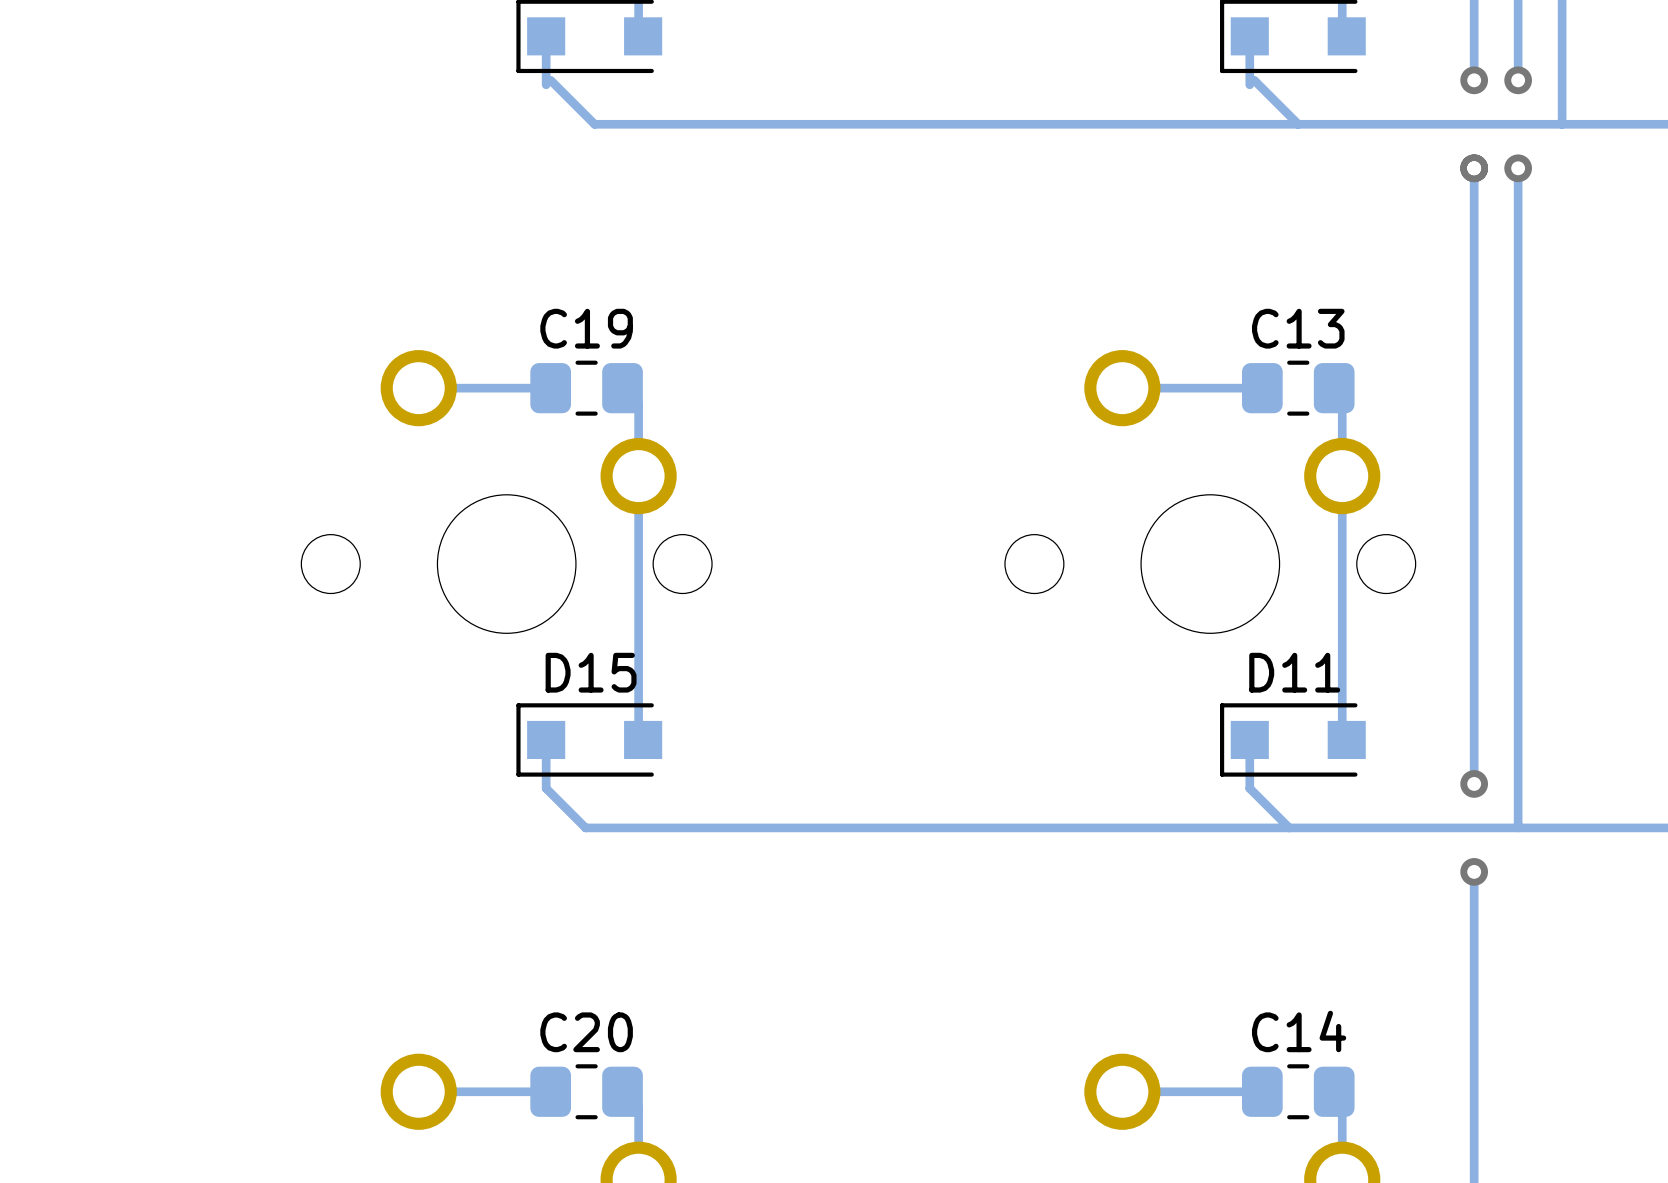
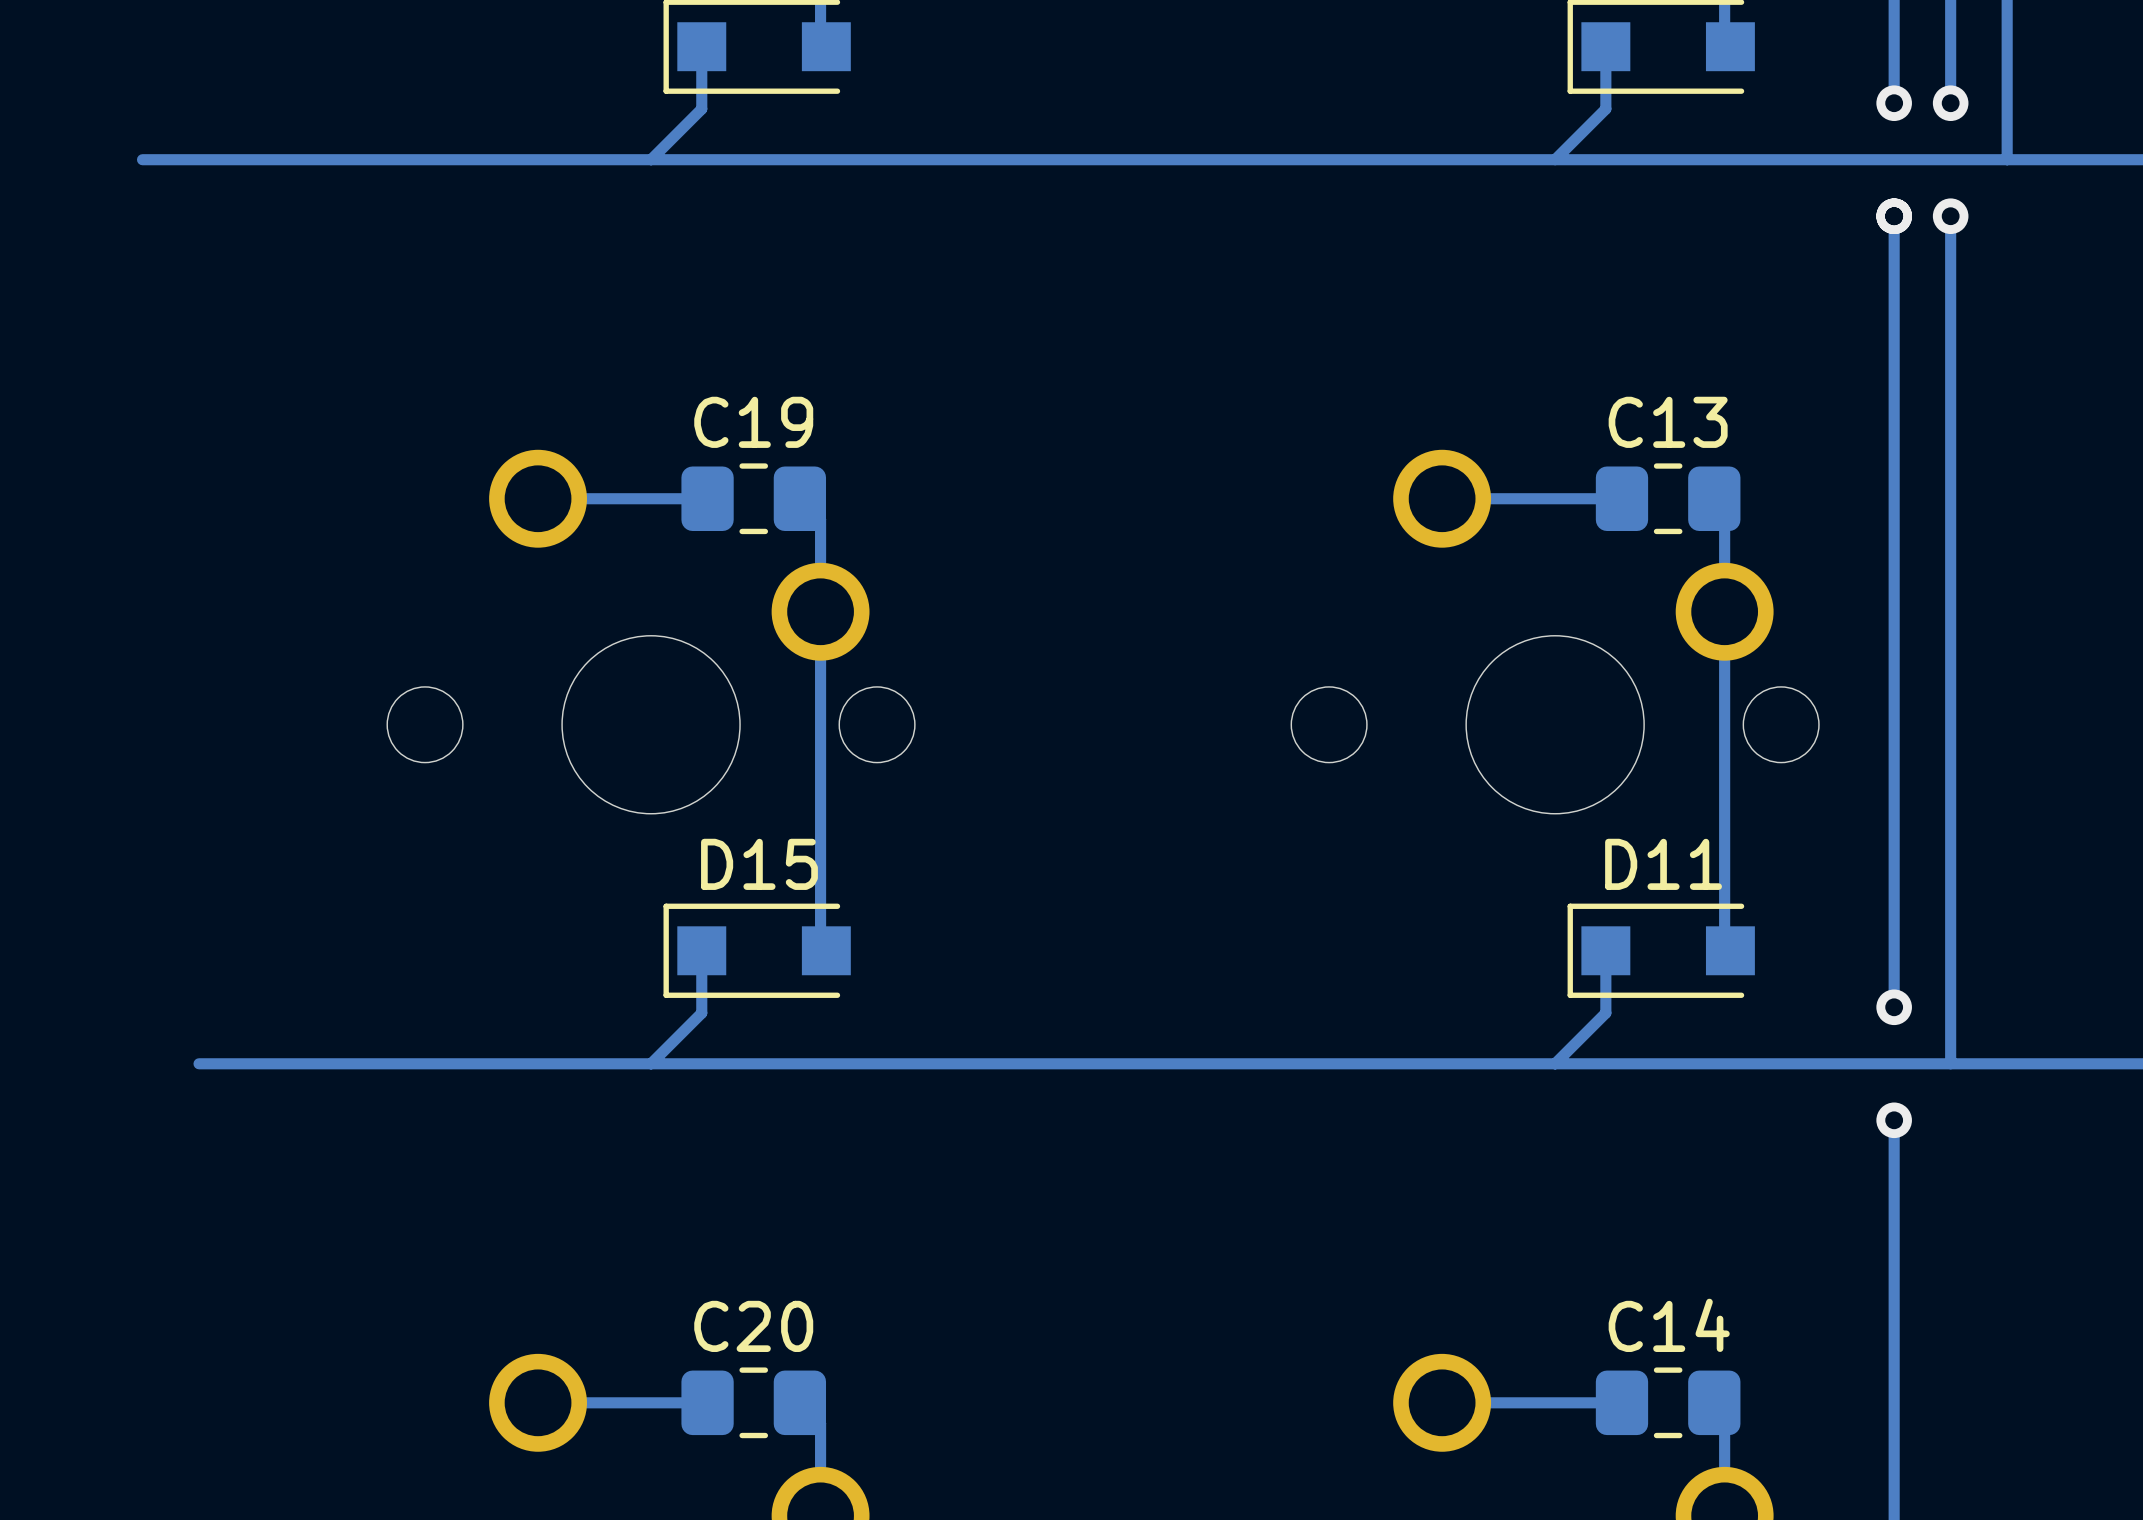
track: (550, 80) (594, 124) -> (142, 159) (764, 159)
track: (1254, 80) (1298, 124) -> none
track: none -> (701, 108) (651, 159)
track: none -> (1605, 108) (1555, 159)
track: (546, 788) (585, 827) -> (701, 1013) (651, 1063)
track: (1249, 788) (1289, 827) -> (1605, 1013) (1555, 1063)
track: none -> (752, 1063) (199, 1063)

